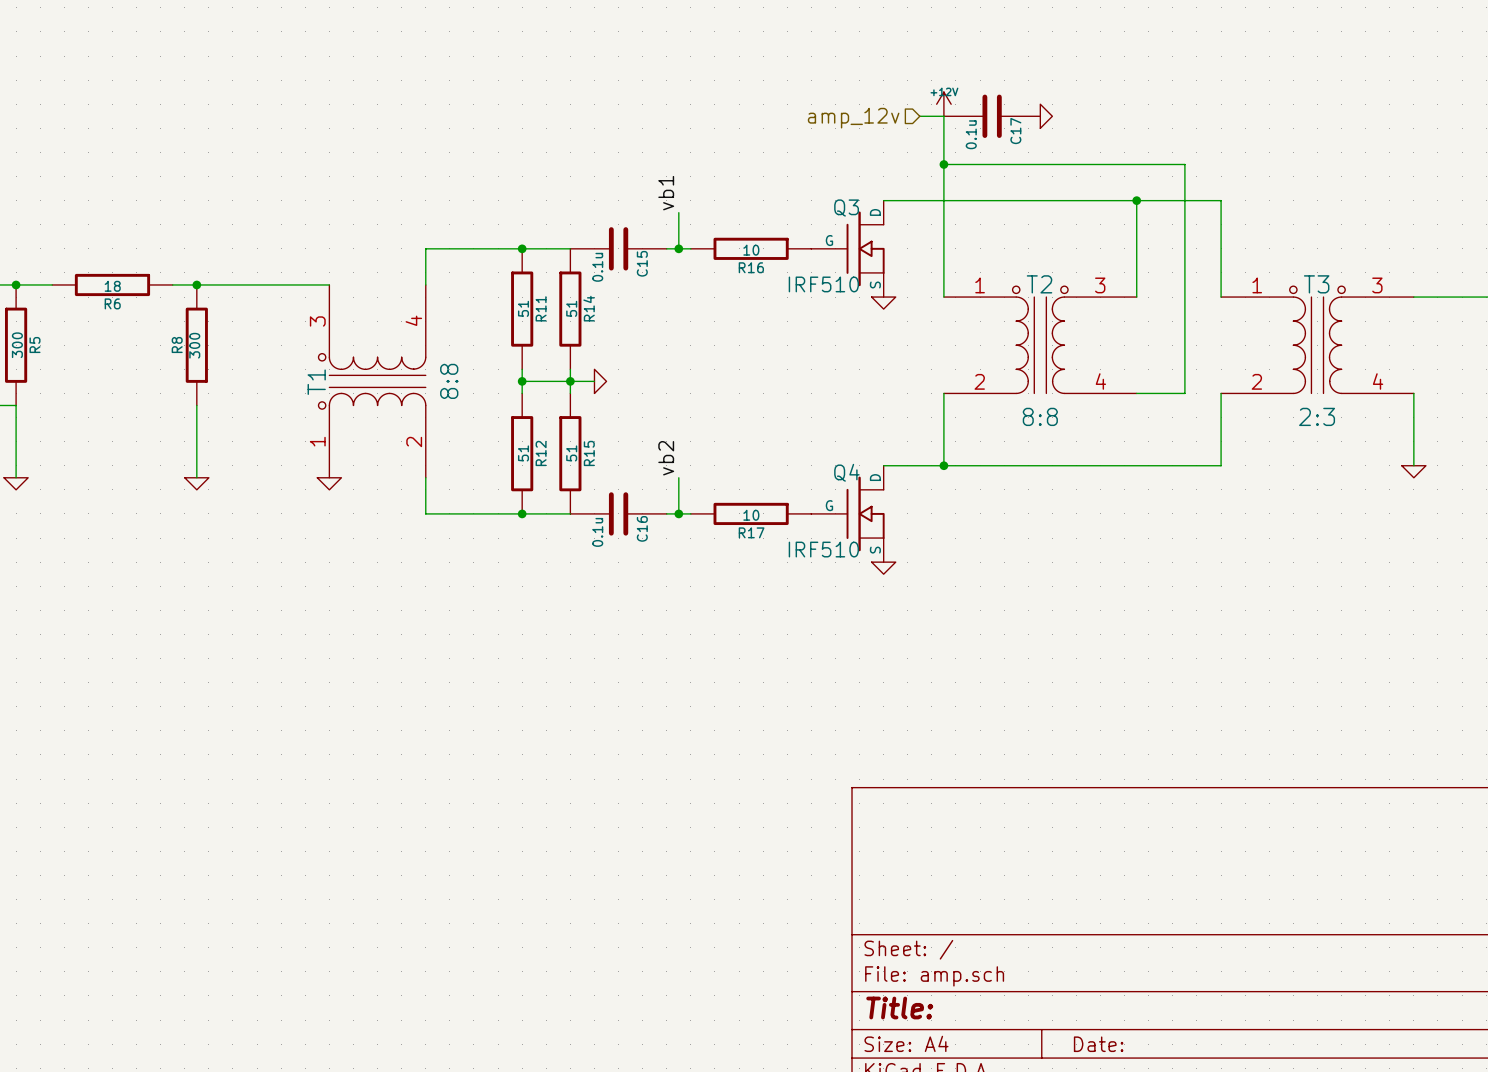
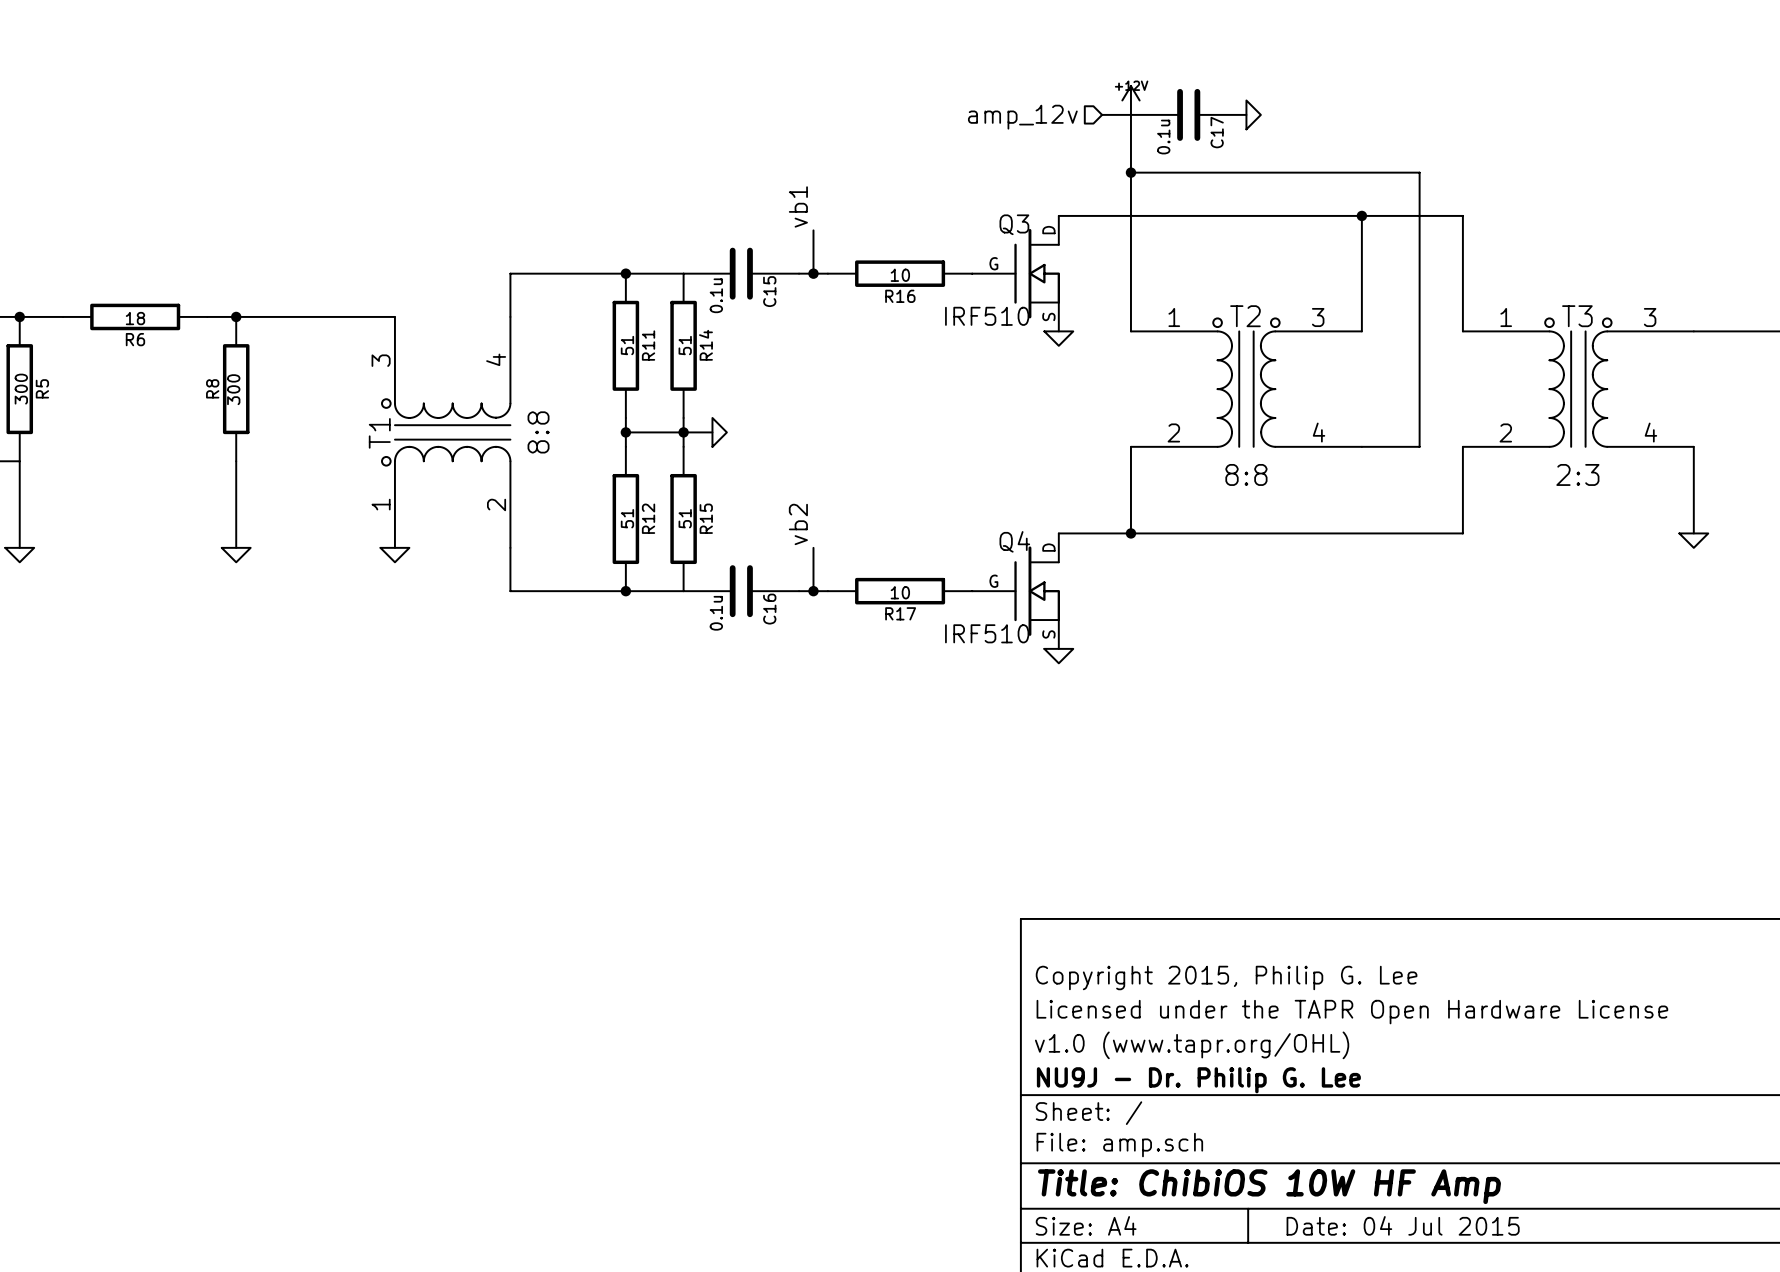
title block: none -> Copyright 2015, Philip G. Lee (1226, 977)
title block: none -> Licensed under the TAPR Open Hardware License (1352, 1012)
title block: none -> v1.0 (www.tapr.org/OHL) (1192, 1045)
title block: none -> NU9J - Dr. Philip G. Lee (1198, 1080)
title block: Title: (899, 1008) -> Title: ChibiOS 10W HF Amp (1269, 1186)
title block: Date: (1098, 1044) -> Date: 04 Jul 2015 (1403, 1225)

